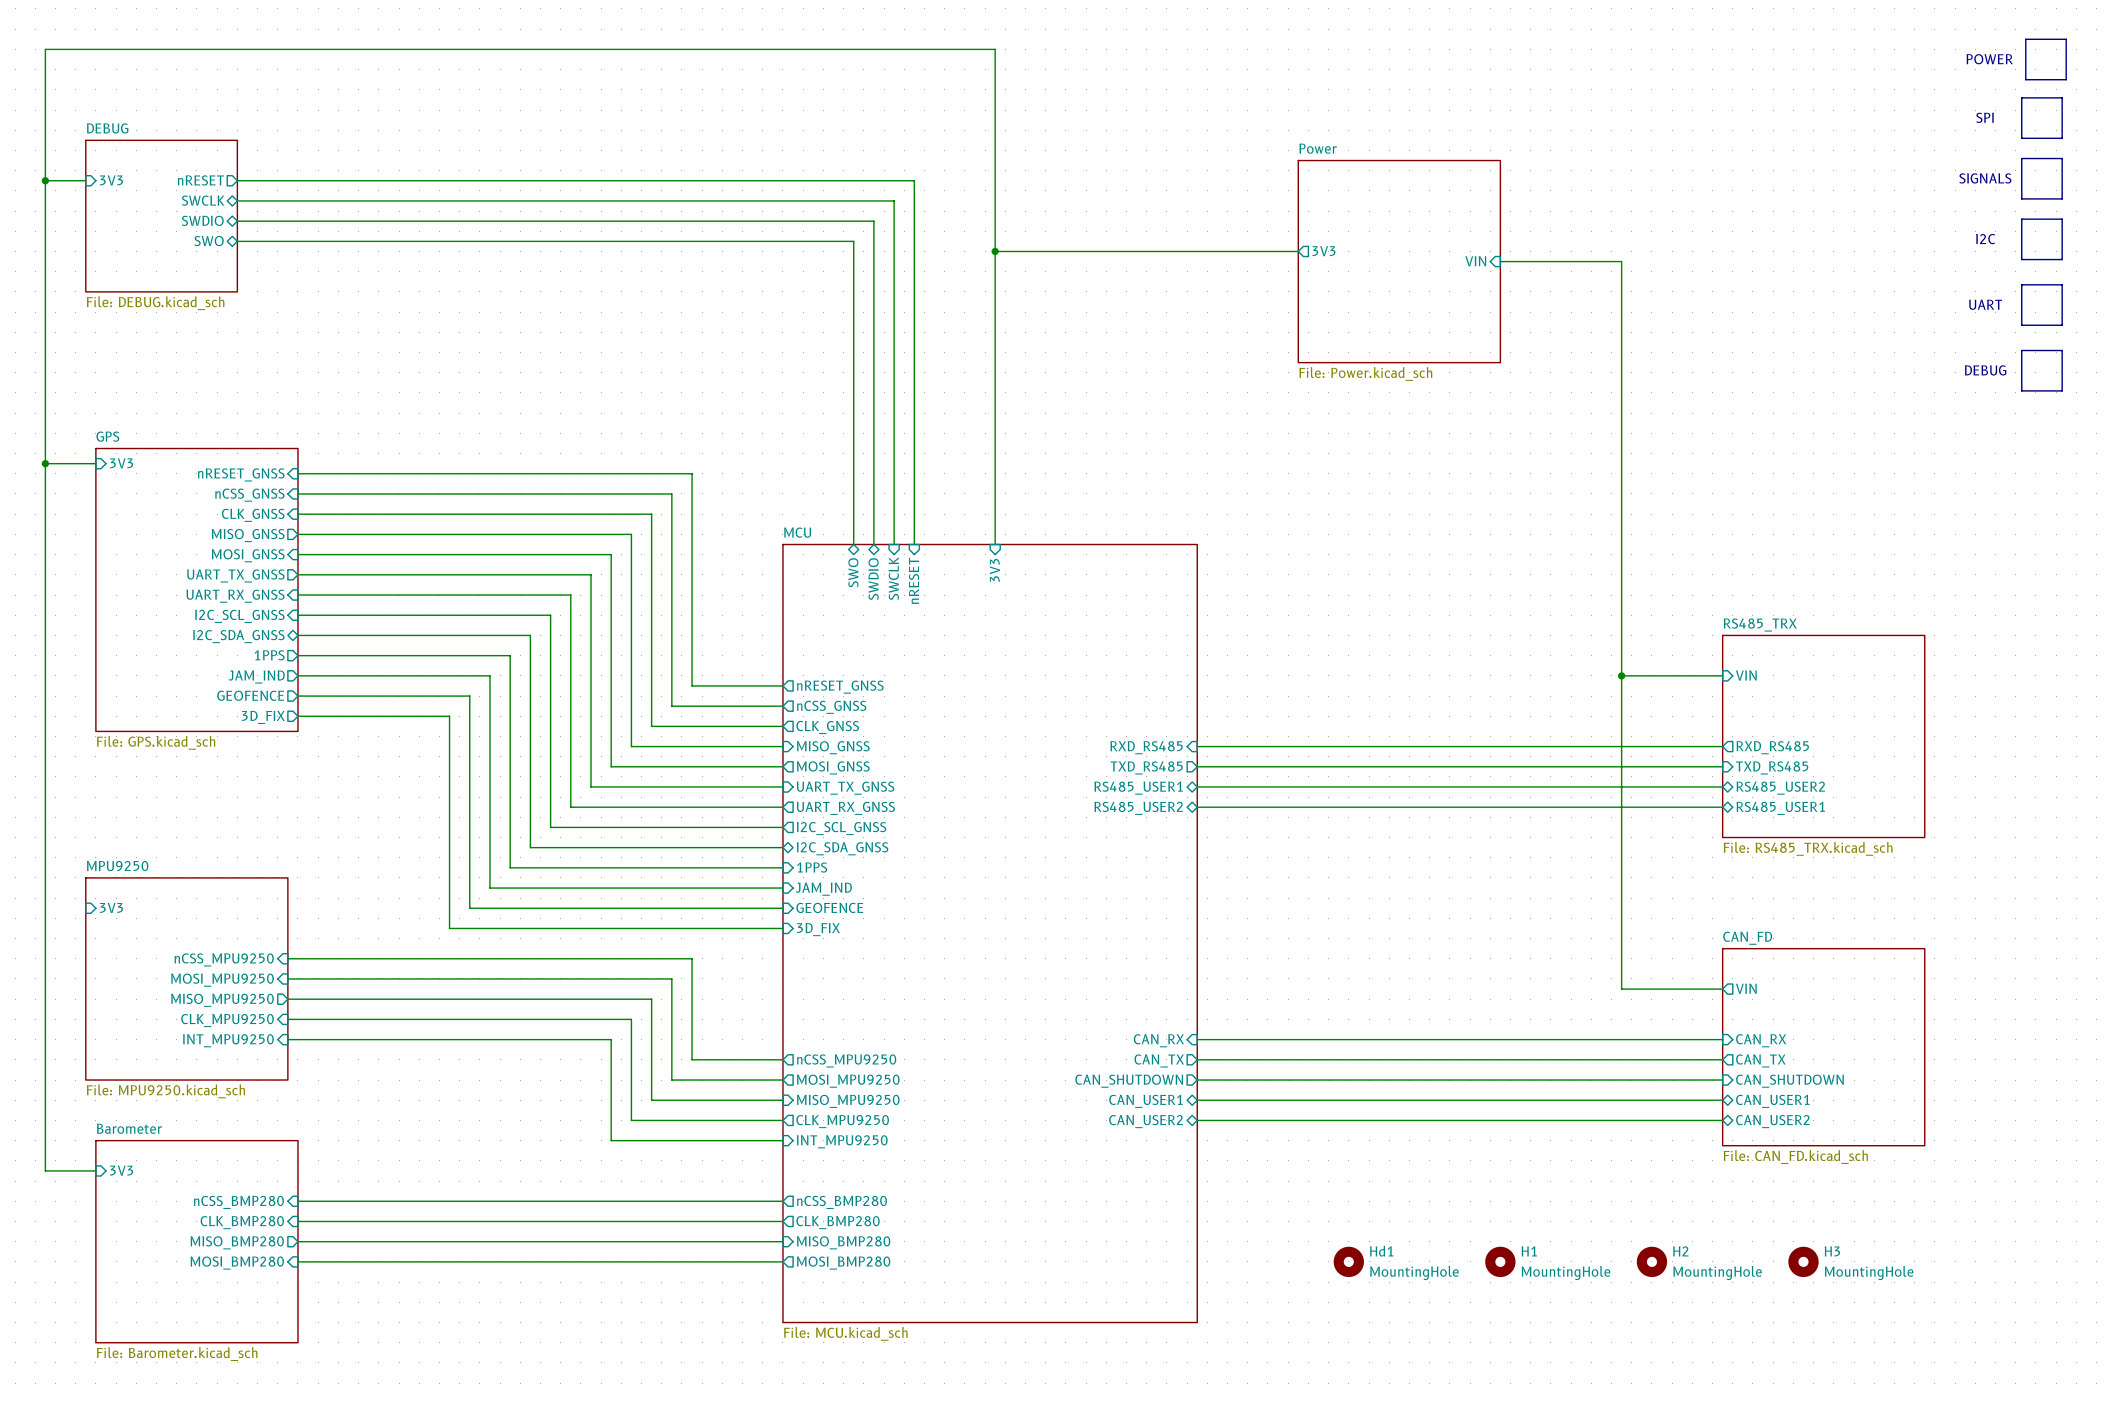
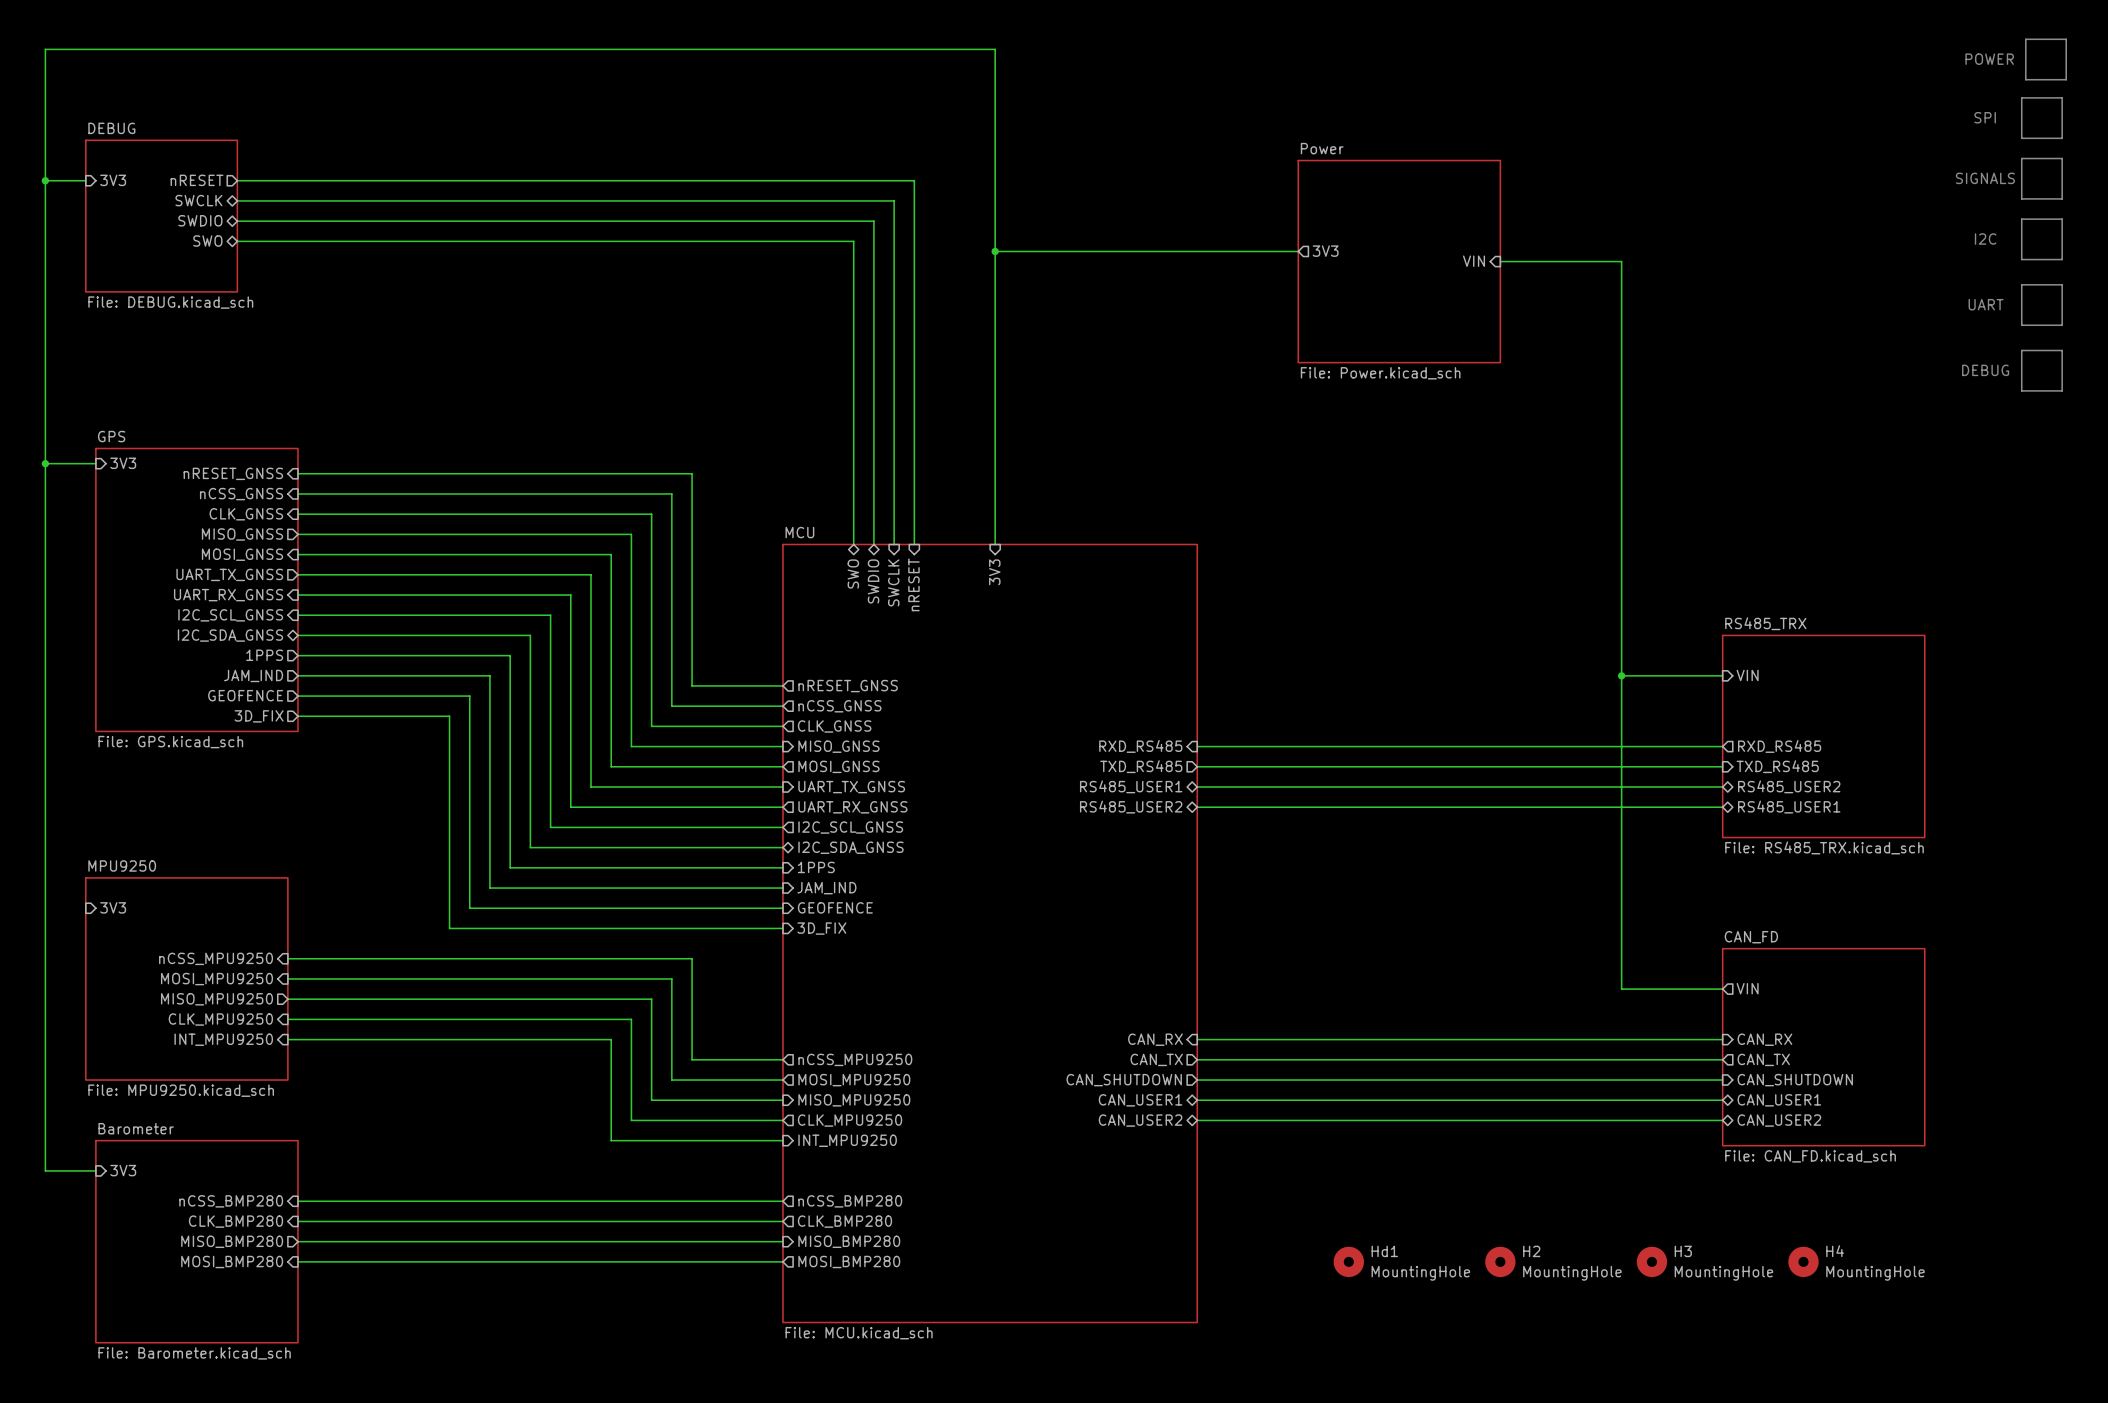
H1 name: H1 (1529, 1251) -> H2 (1531, 1251)
H2 name: H2 (1680, 1251) -> H3 (1683, 1251)
H3 name: H3 (1832, 1251) -> H4 (1835, 1251)

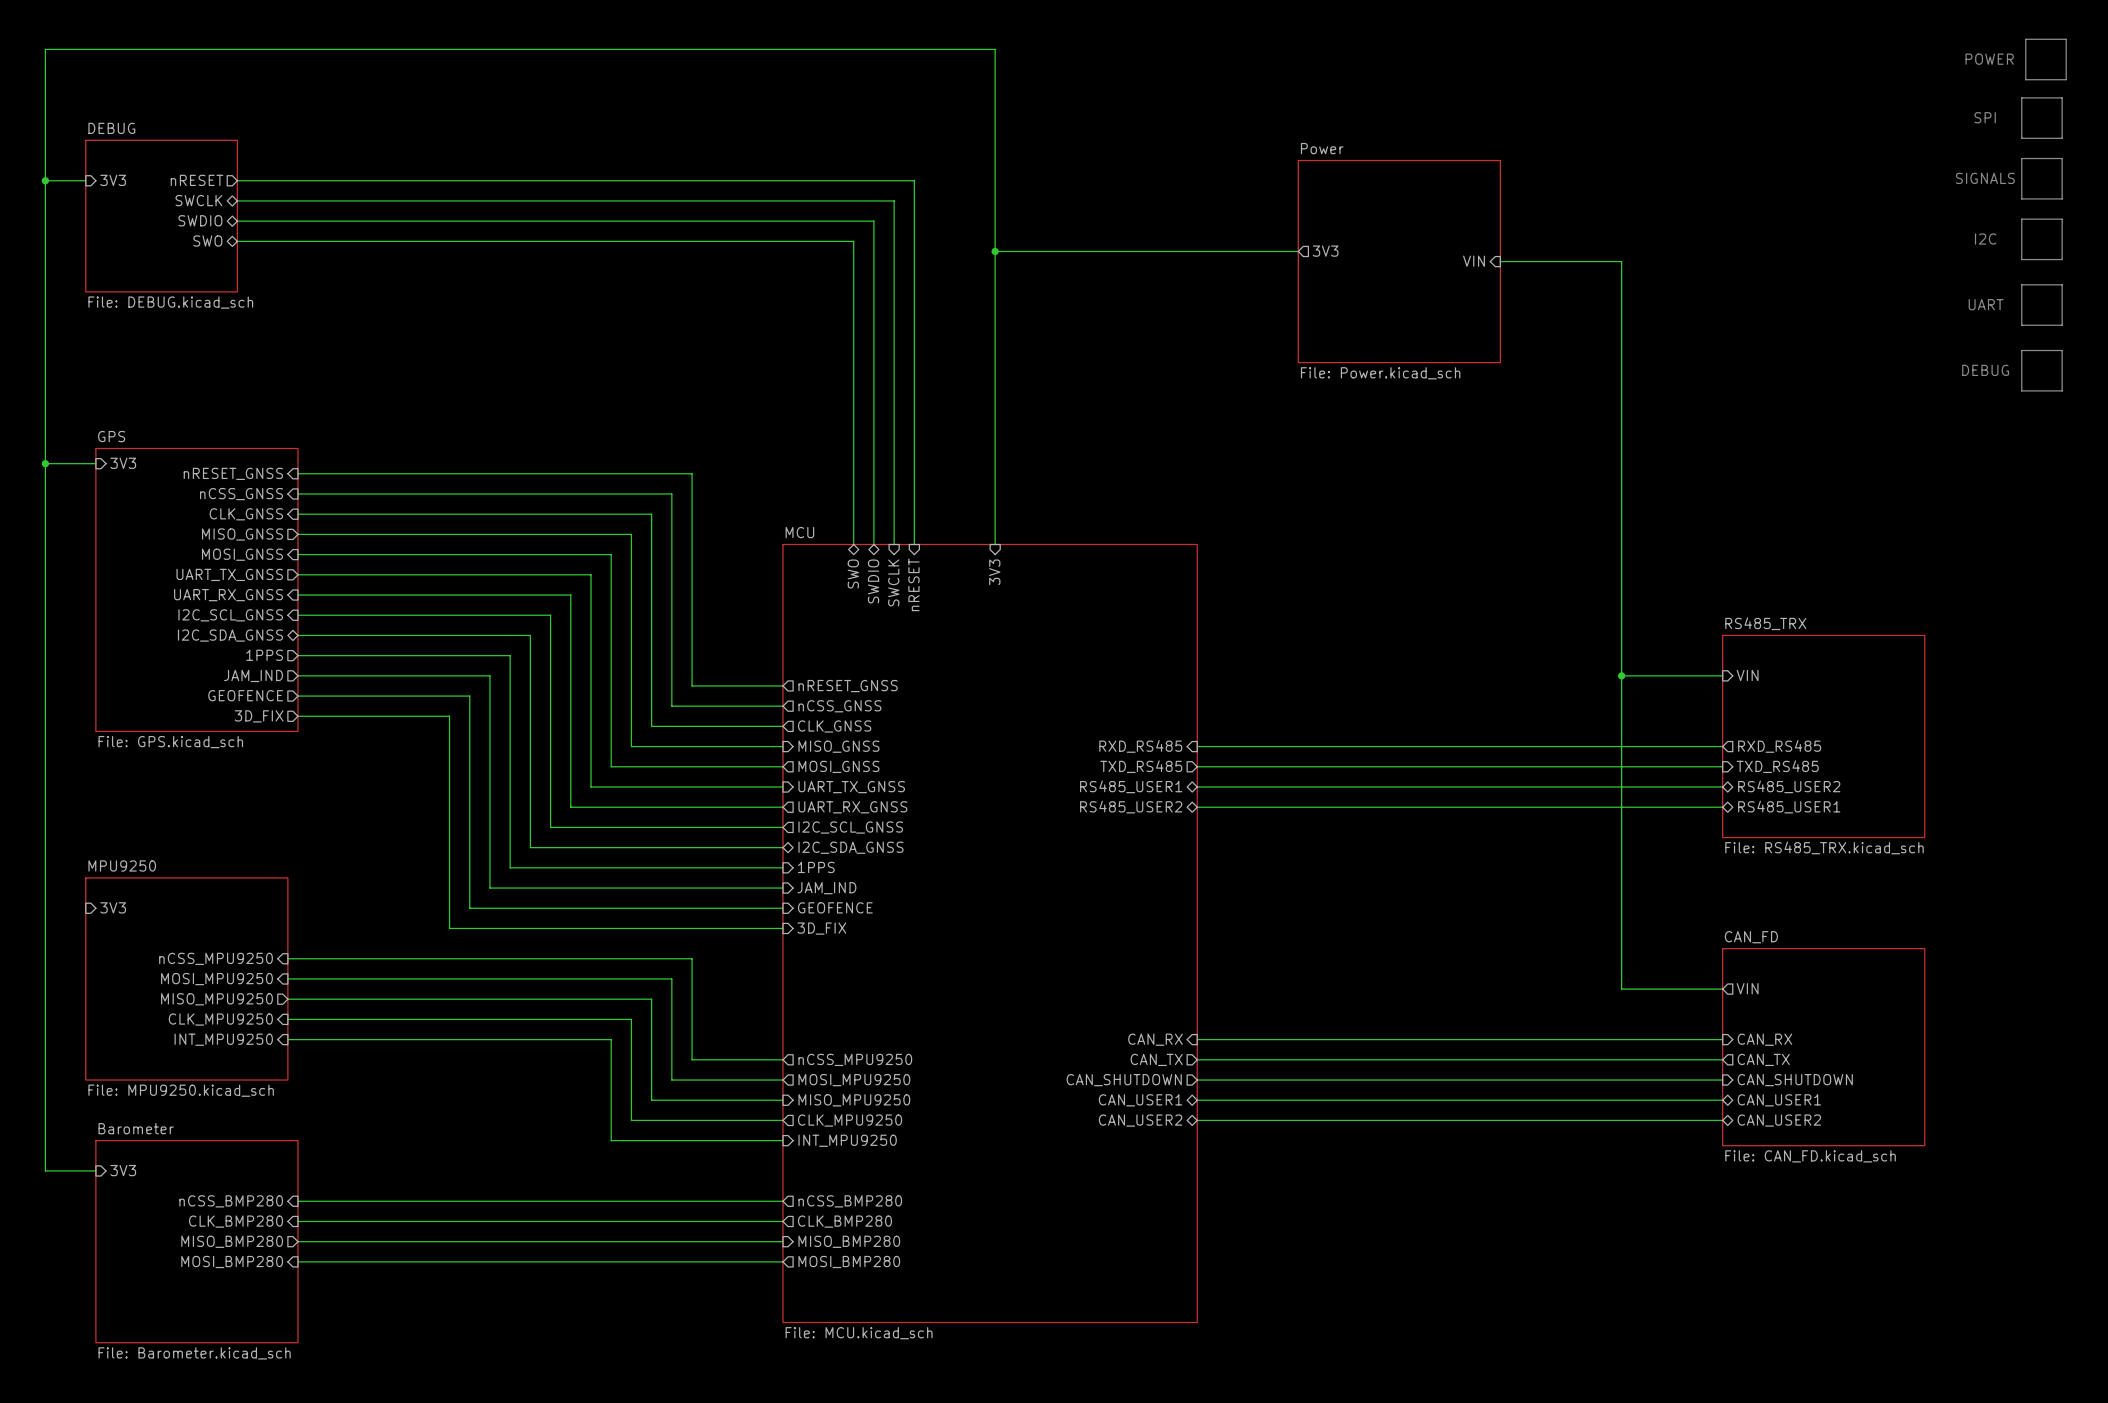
Hd1: MountingHole (1348, 1261) -> none
H2: MountingHole (1500, 1261) -> none
H3: MountingHole (1651, 1261) -> none
H4: MountingHole (1803, 1261) -> none

